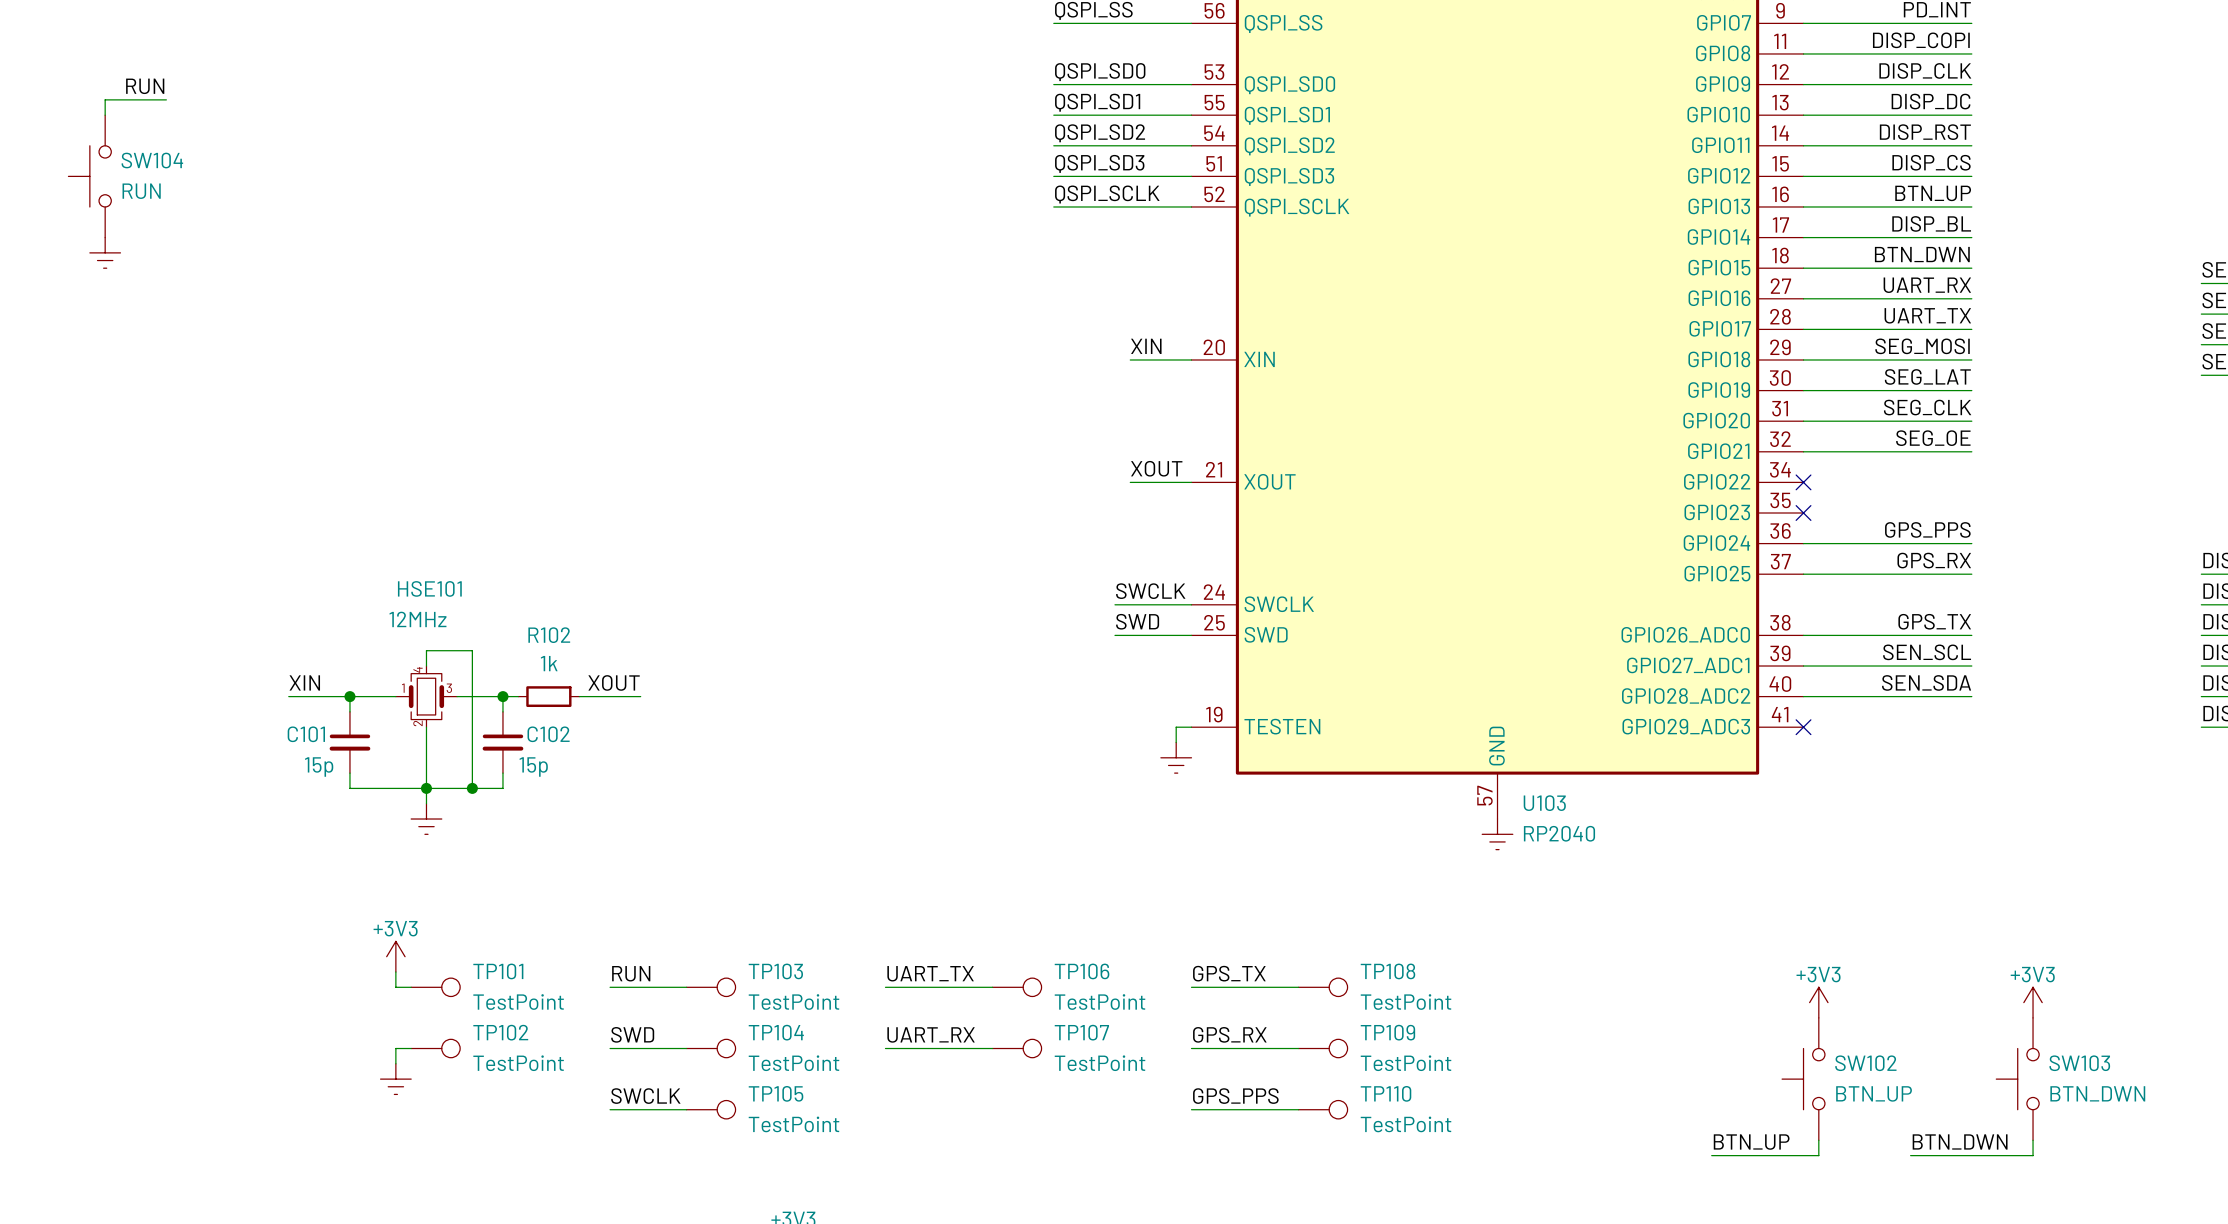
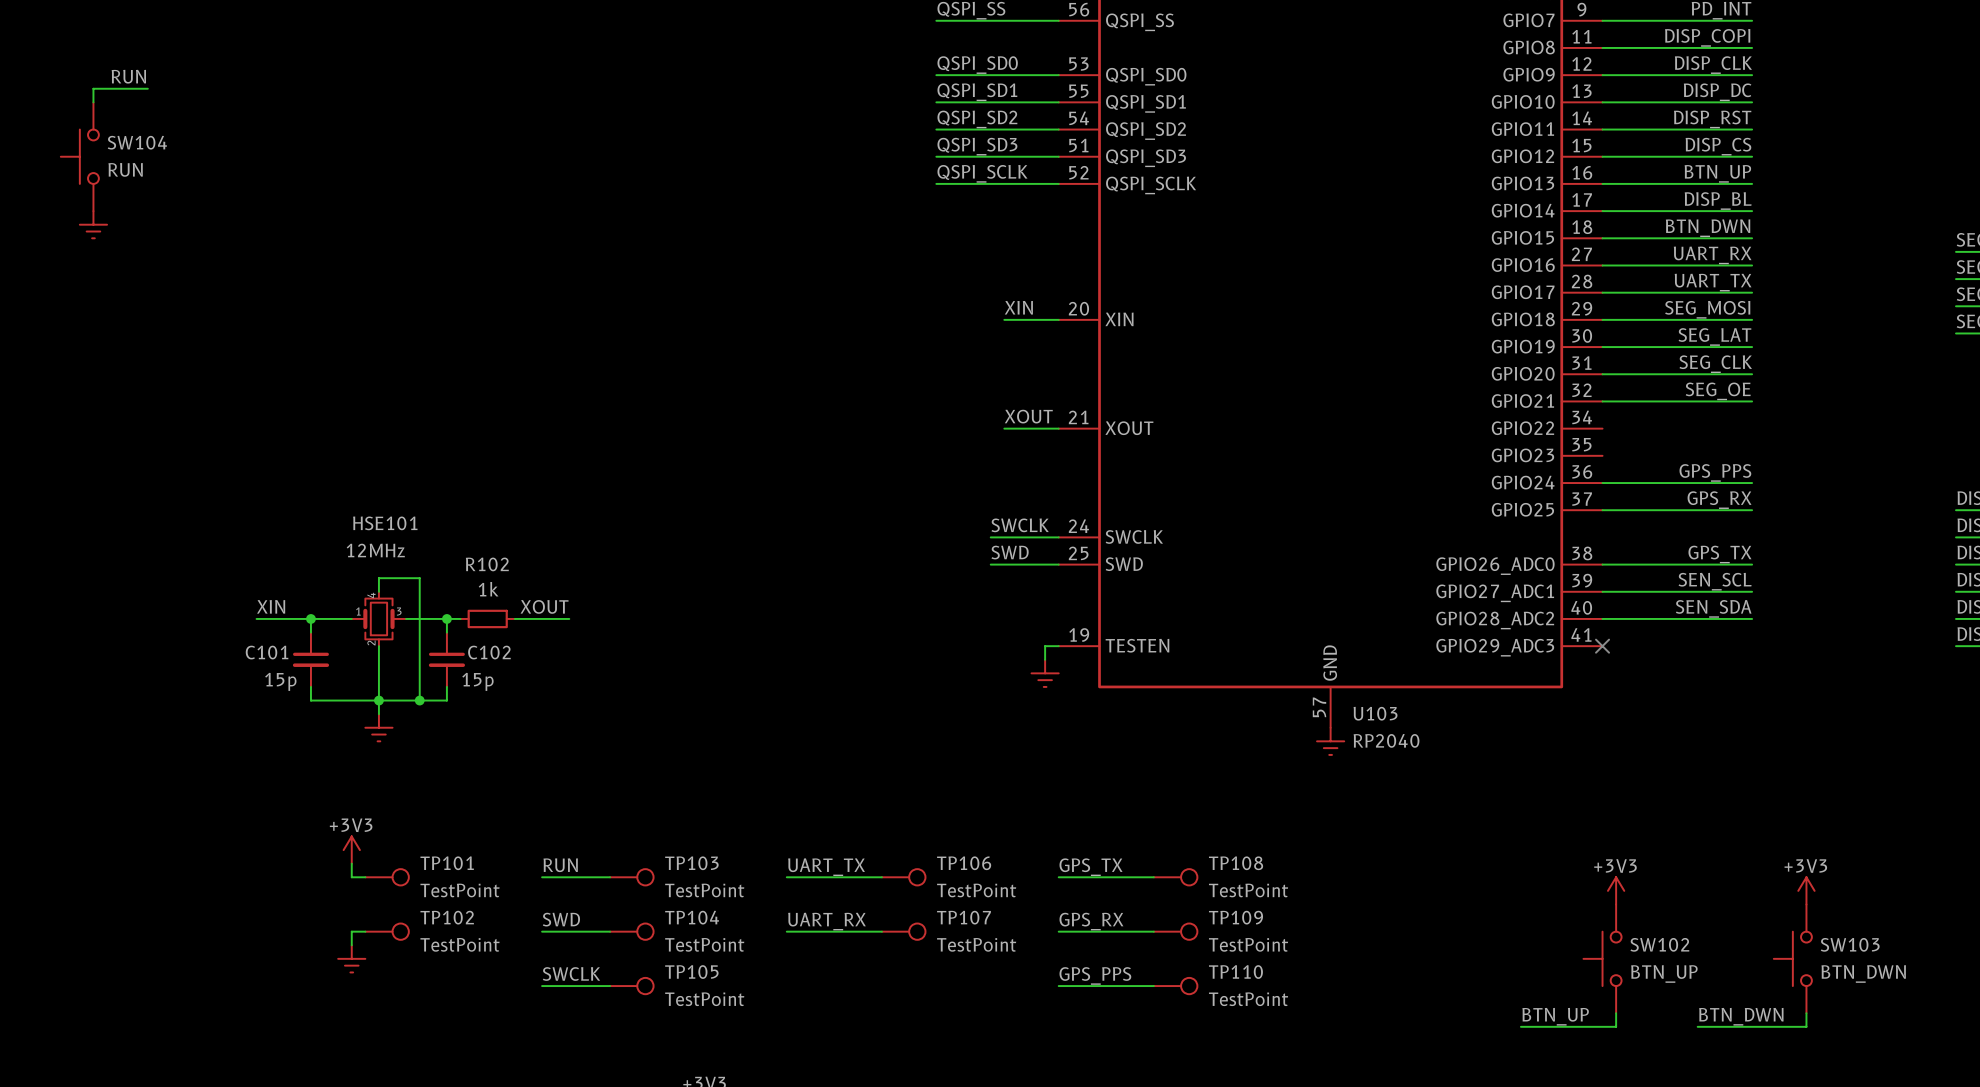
no-connect mark: (1803, 482) -> none
no-connect mark: (1803, 513) -> none

